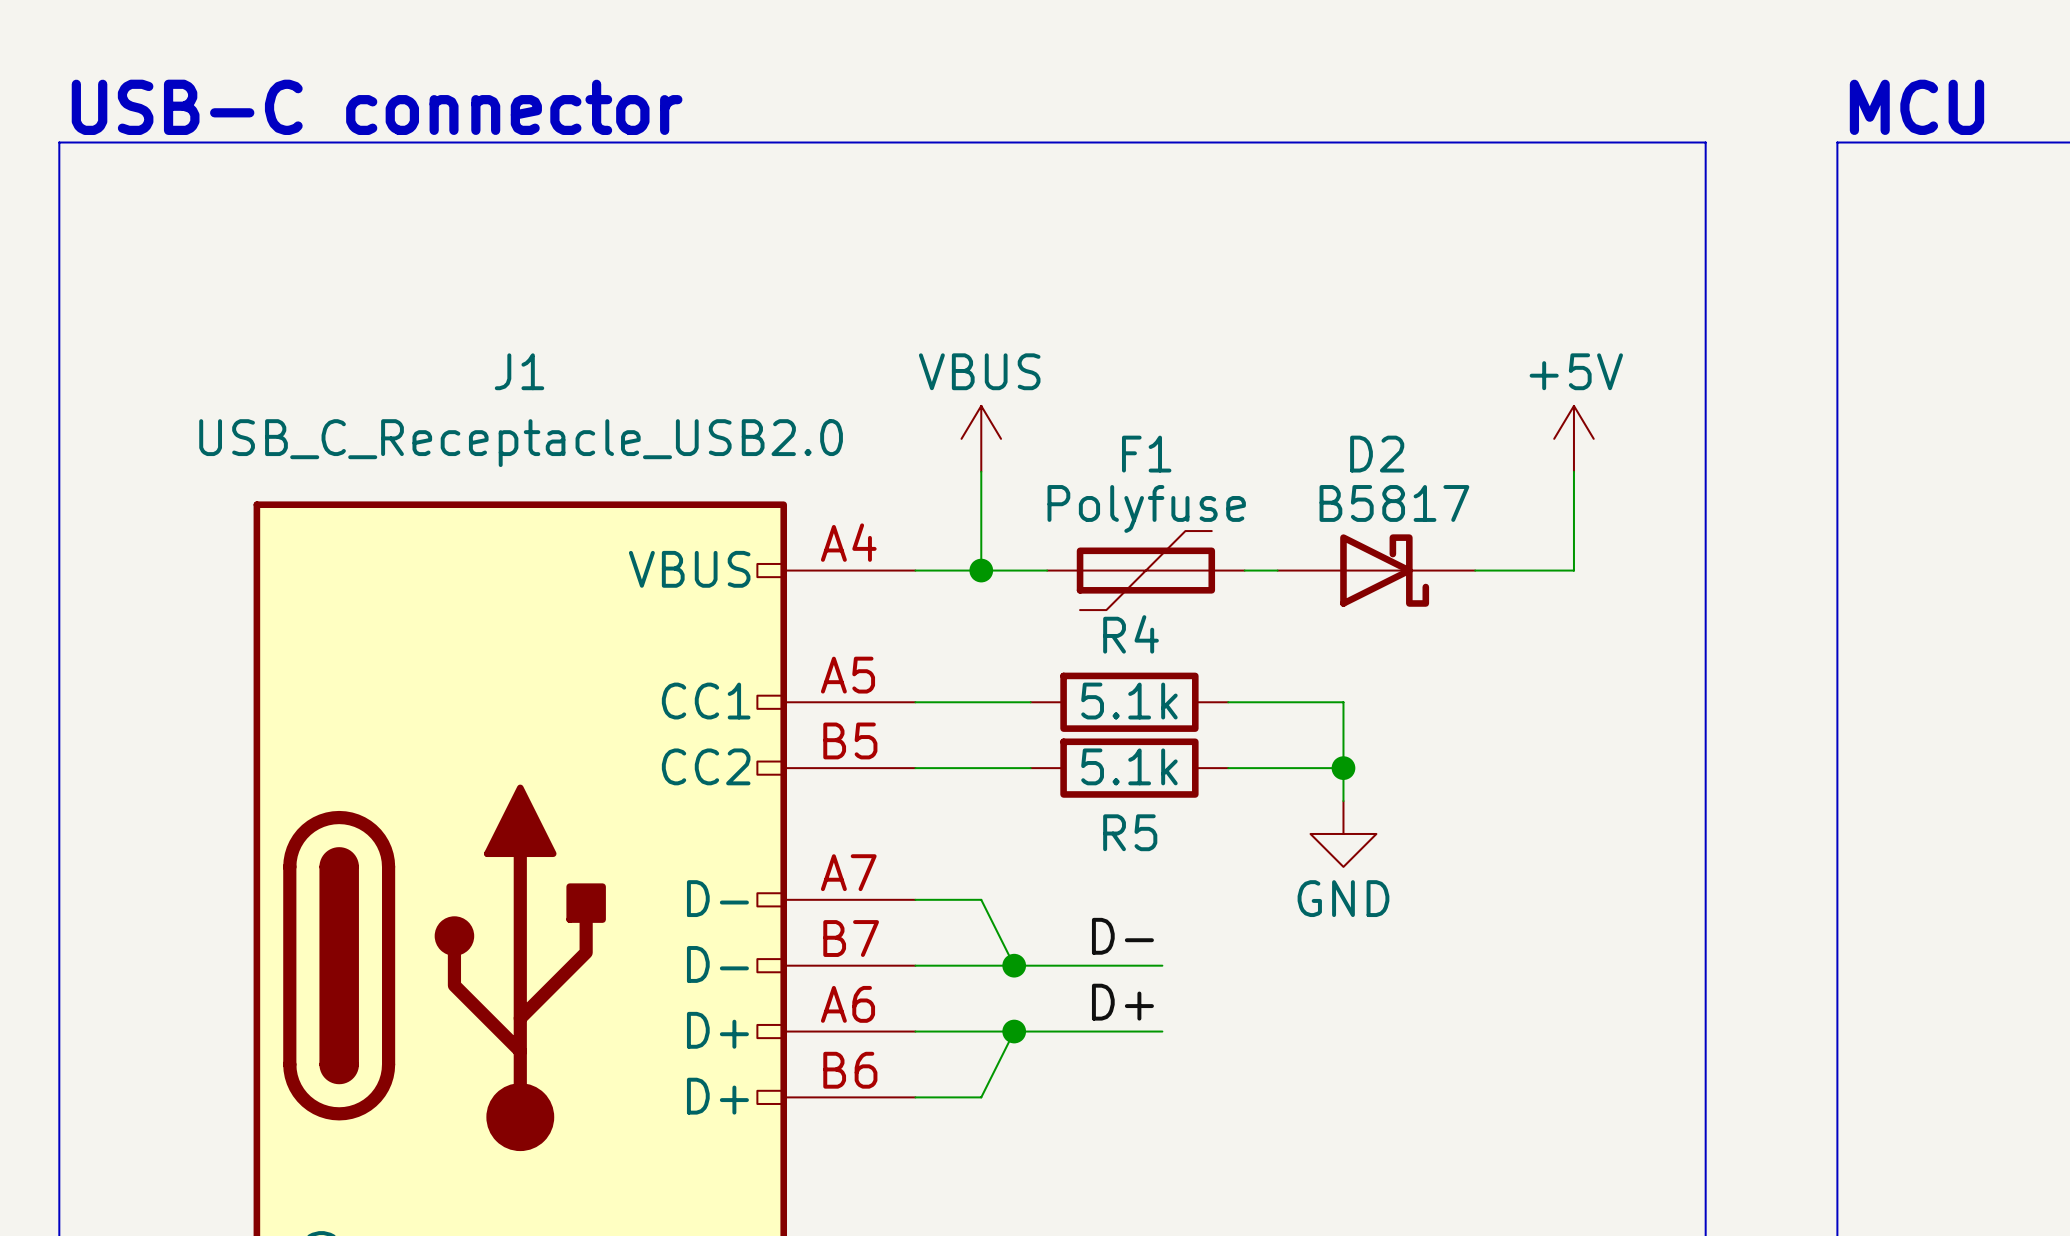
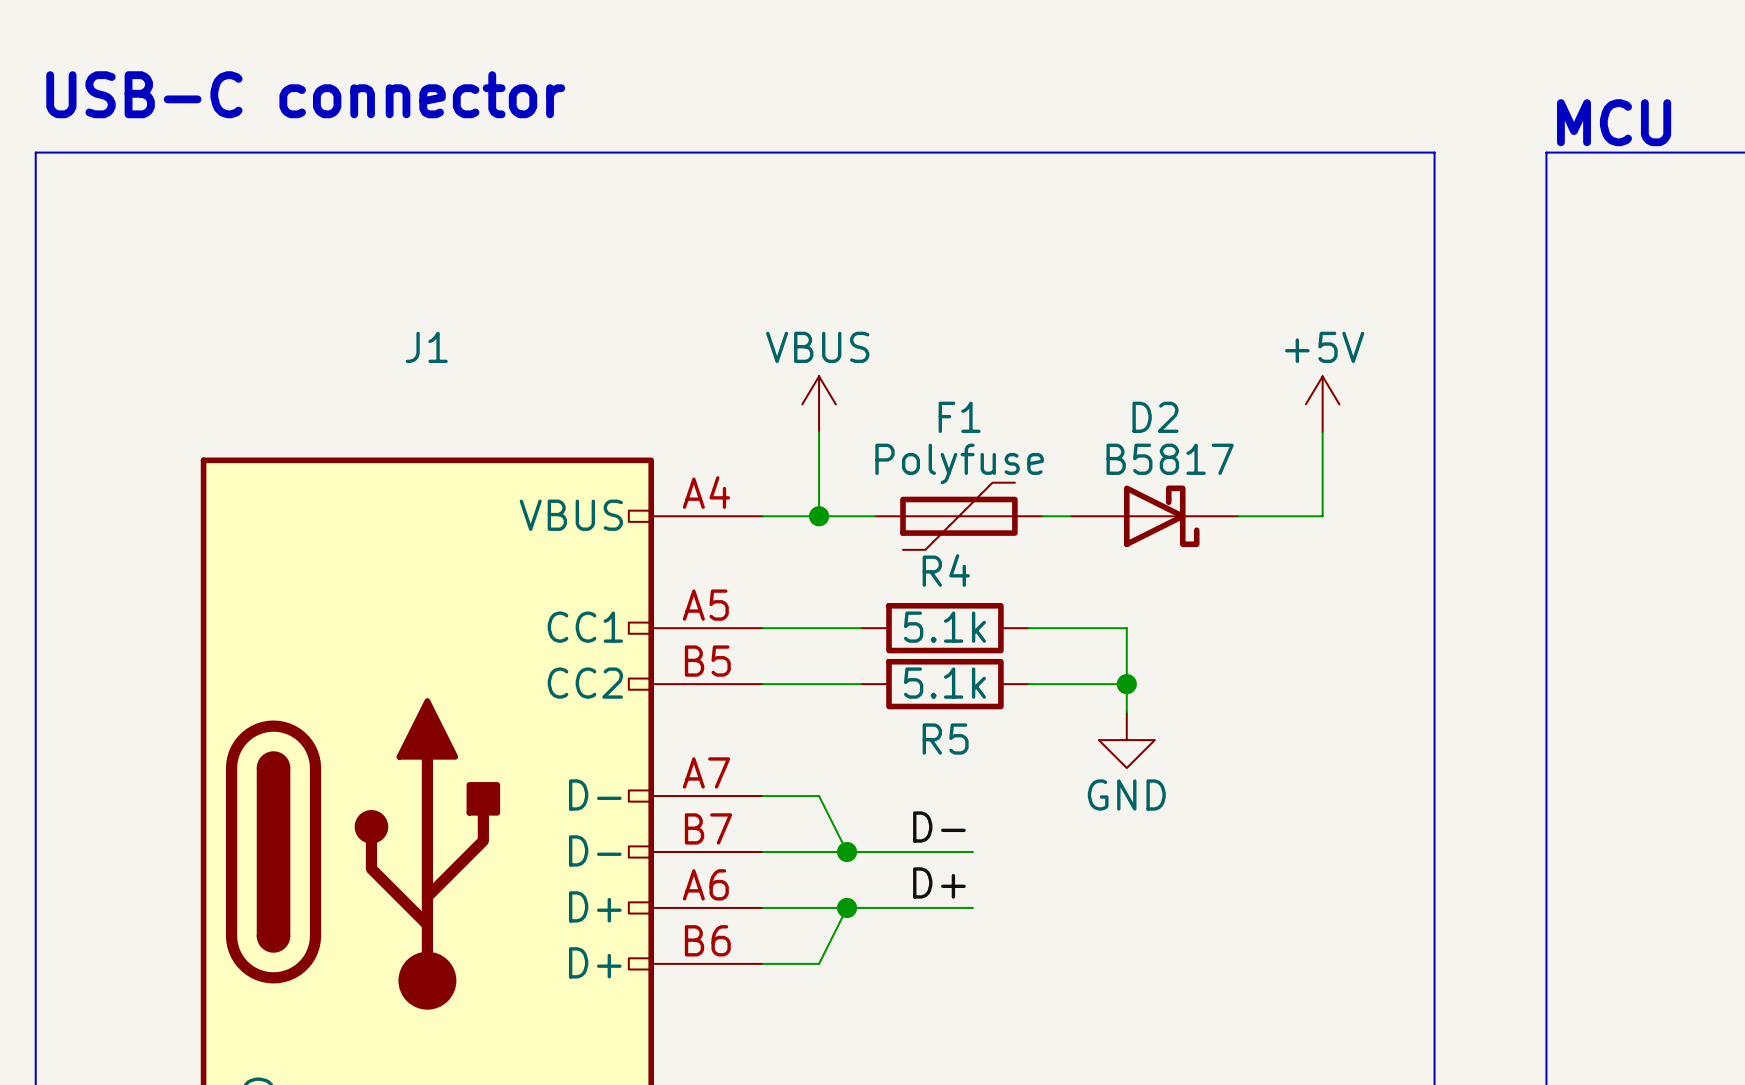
text position: USB-C connector (377, 107) -> USB-C connector (305, 94)
J1 value: USB_C_Receptacle_USB2.0 (521, 443) -> none

